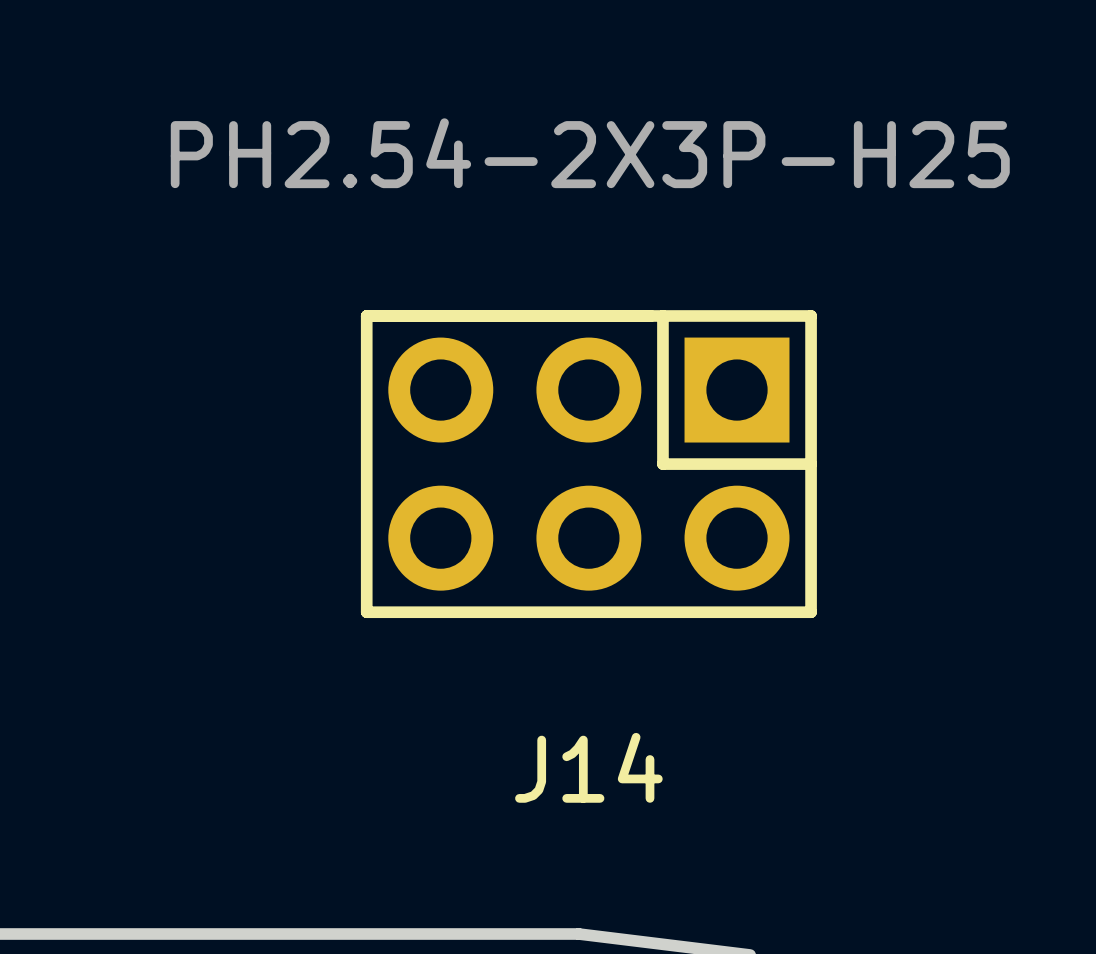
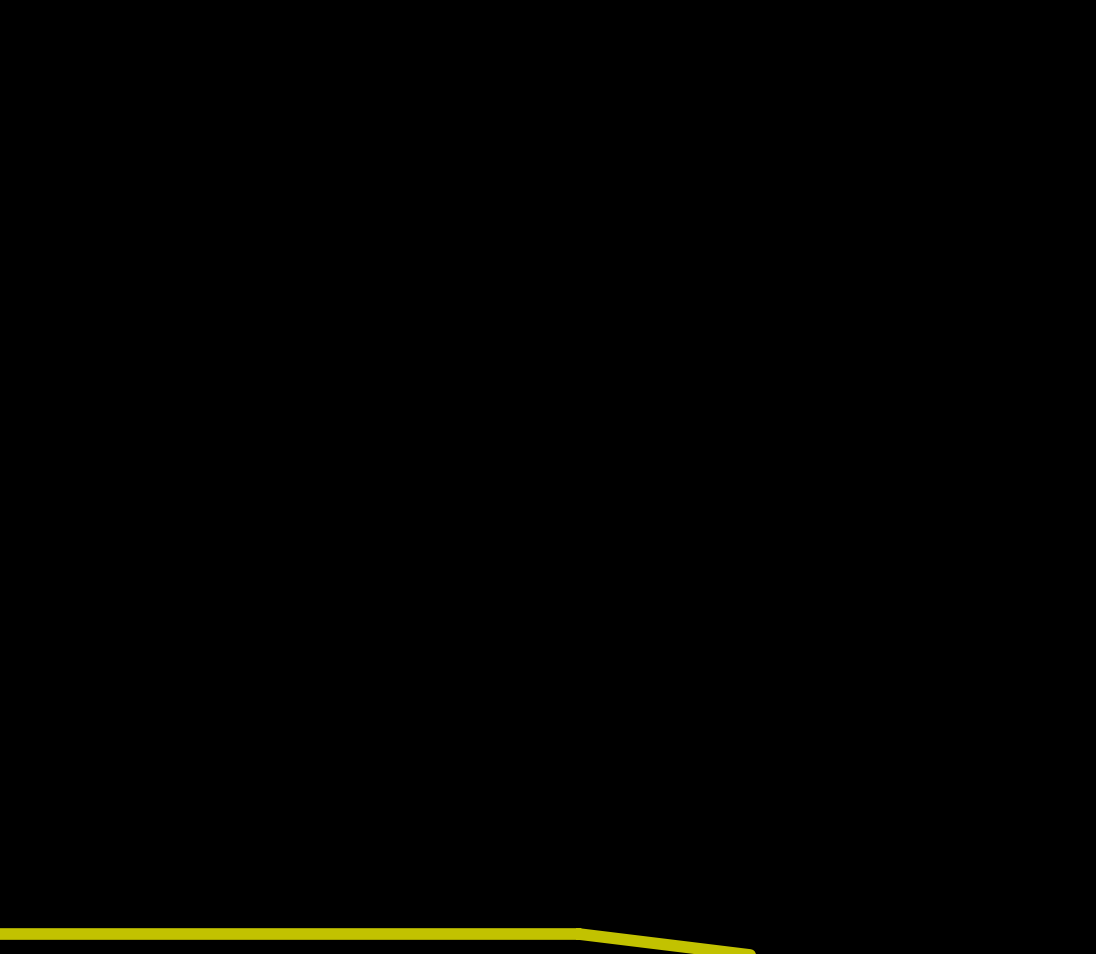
J14: PH2.54-2X3P-H25 (588, 464) -> none

